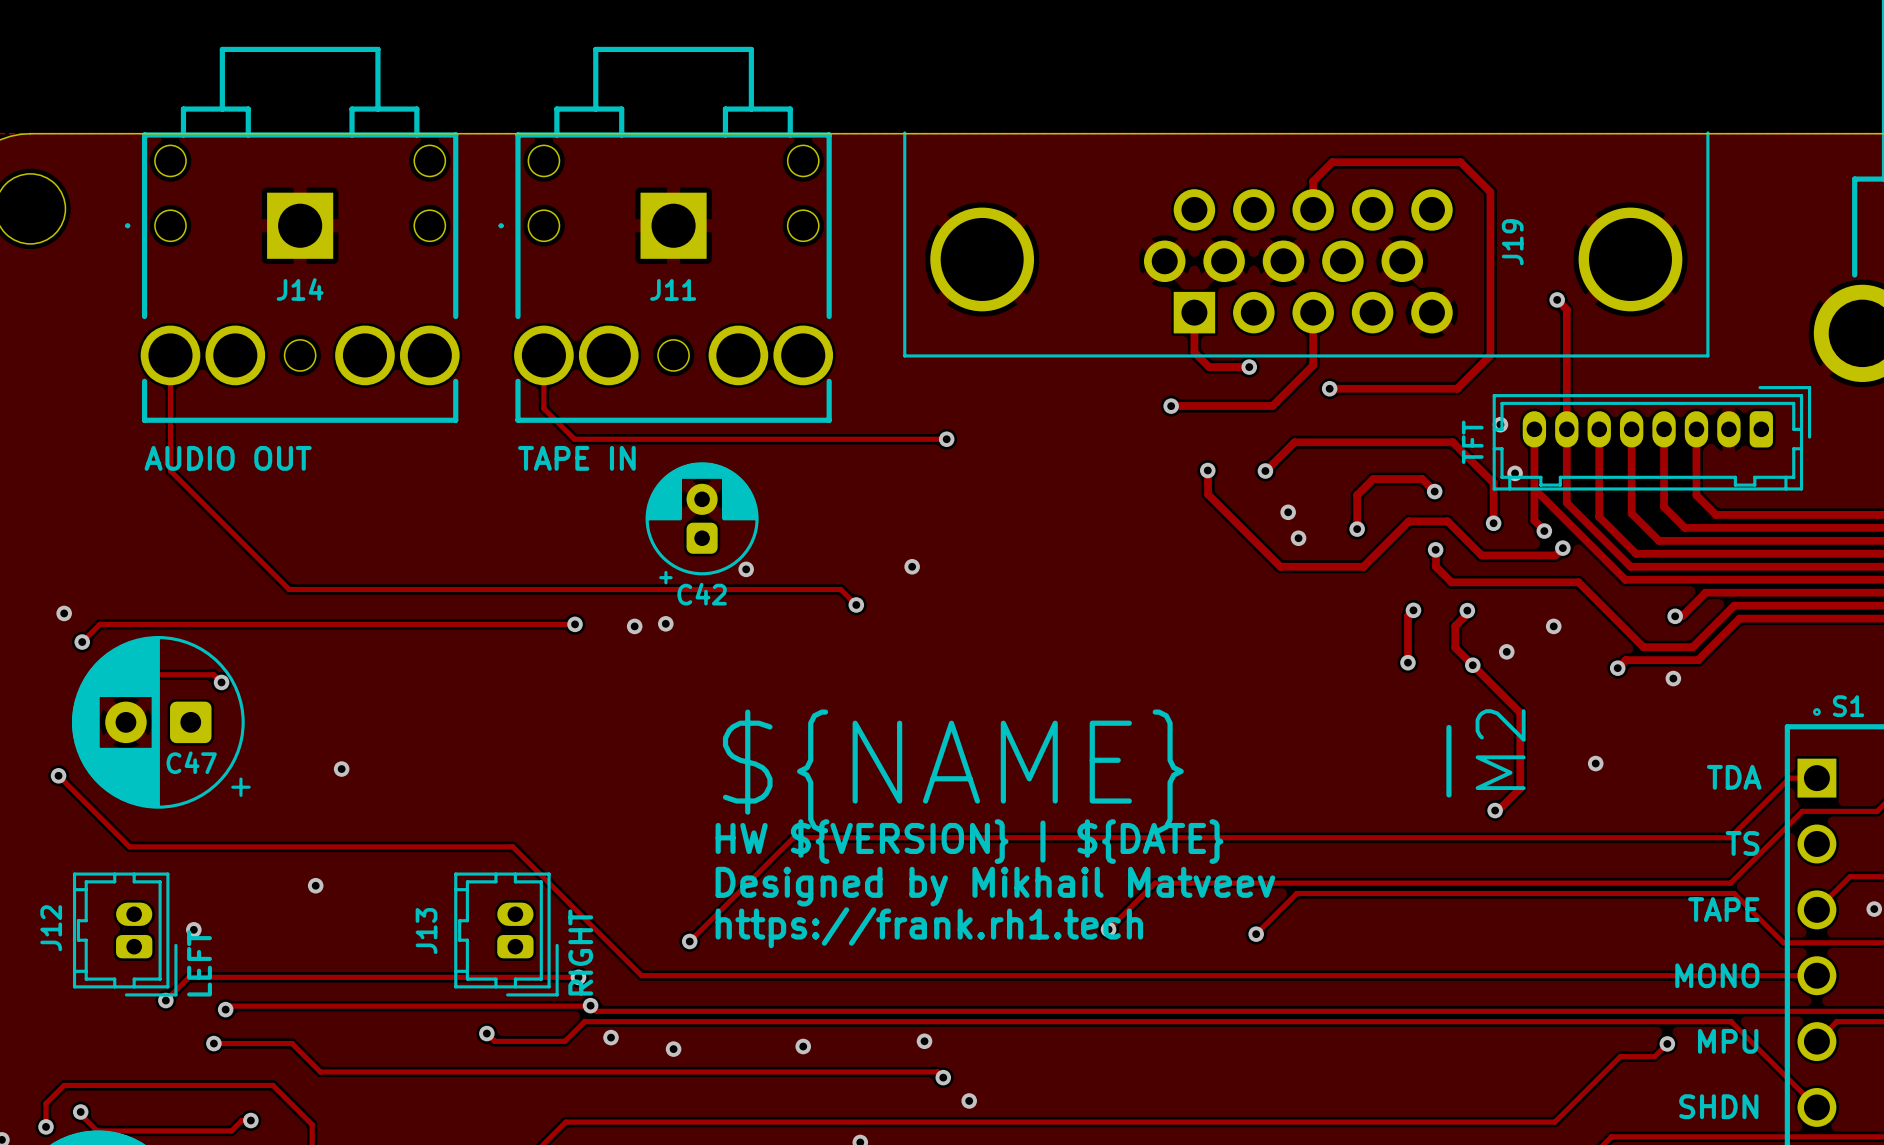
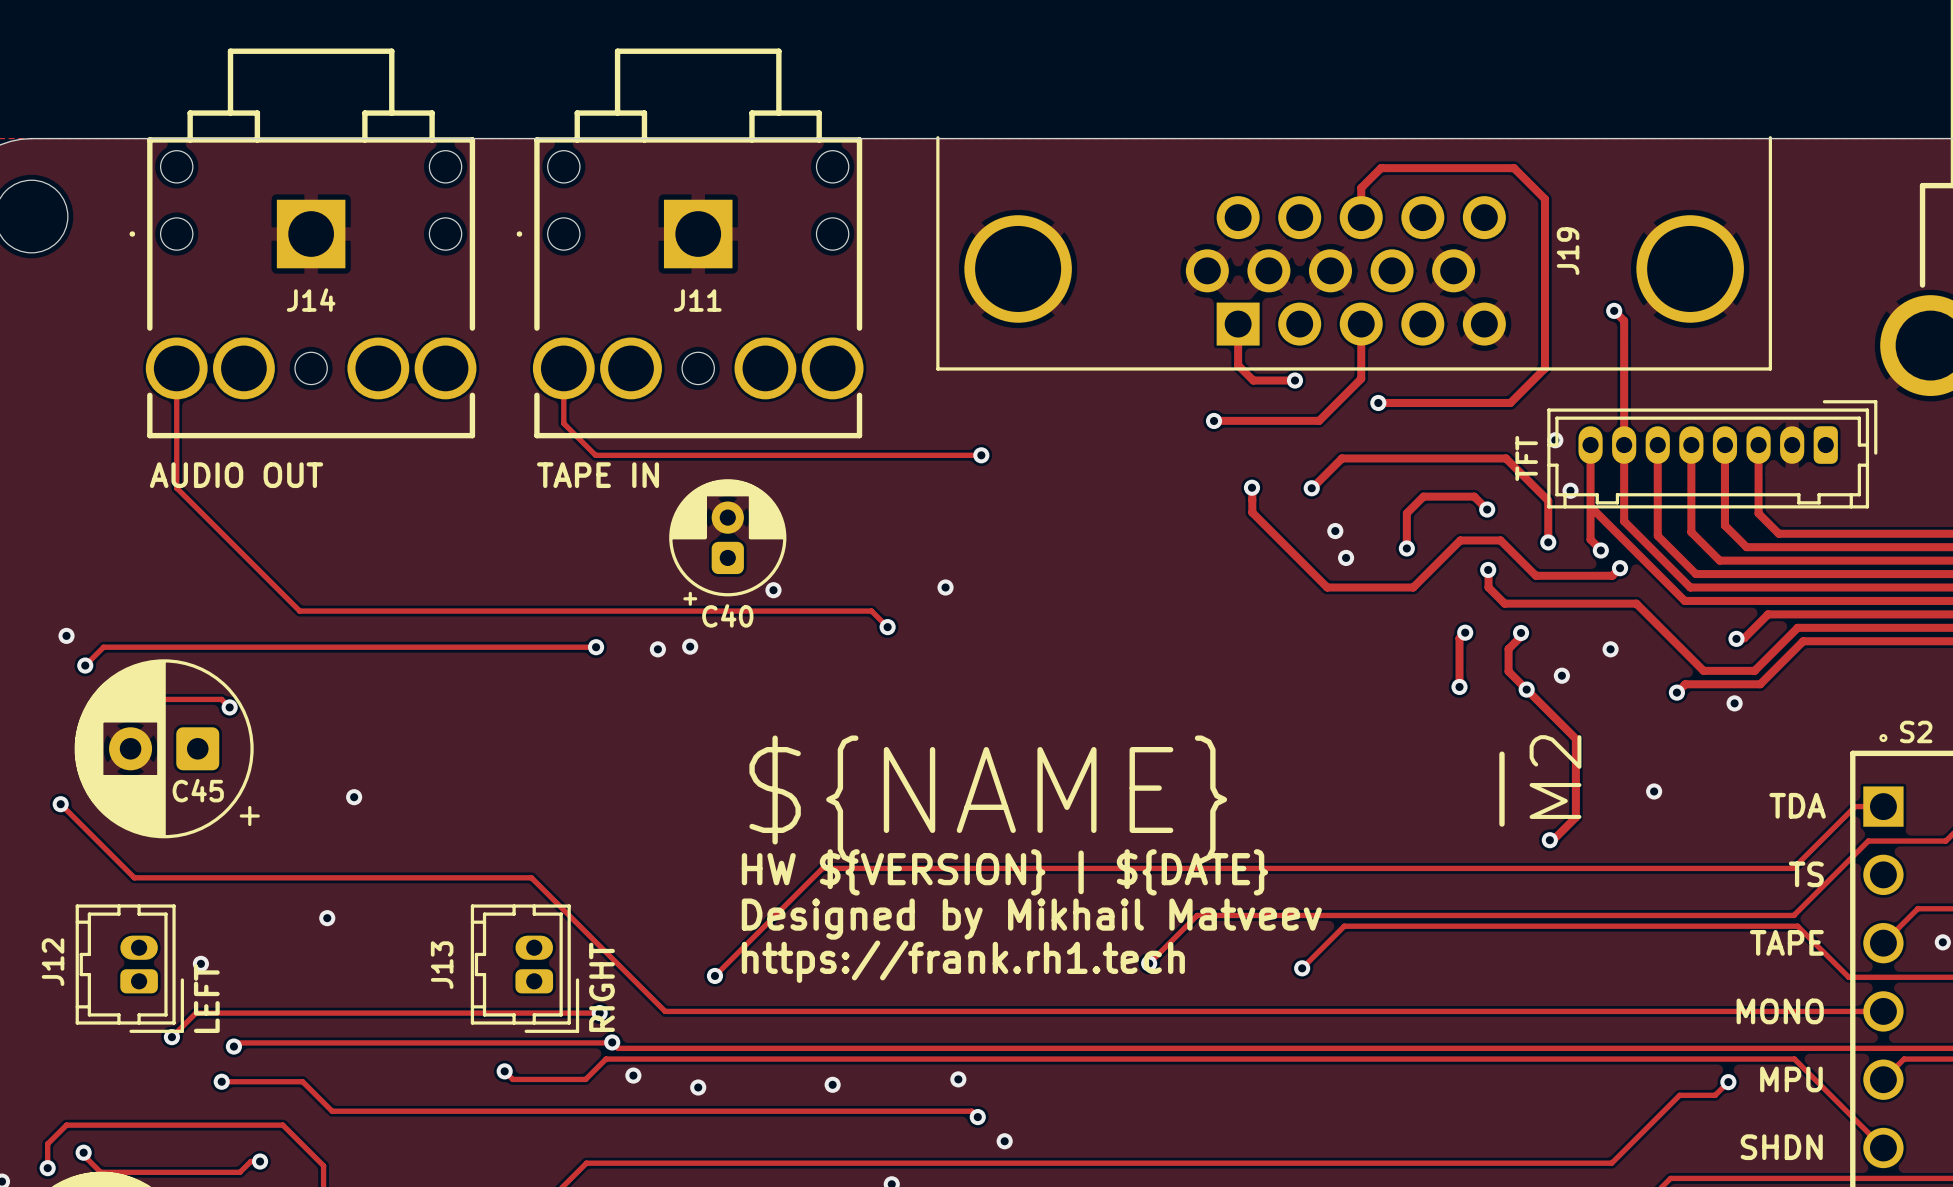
C42 name: C42 (702, 594) -> C40 (727, 615)
S1 name: S1 (1848, 706) -> S2 (1916, 731)
C47 name: C47 (191, 762) -> C45 (198, 790)

